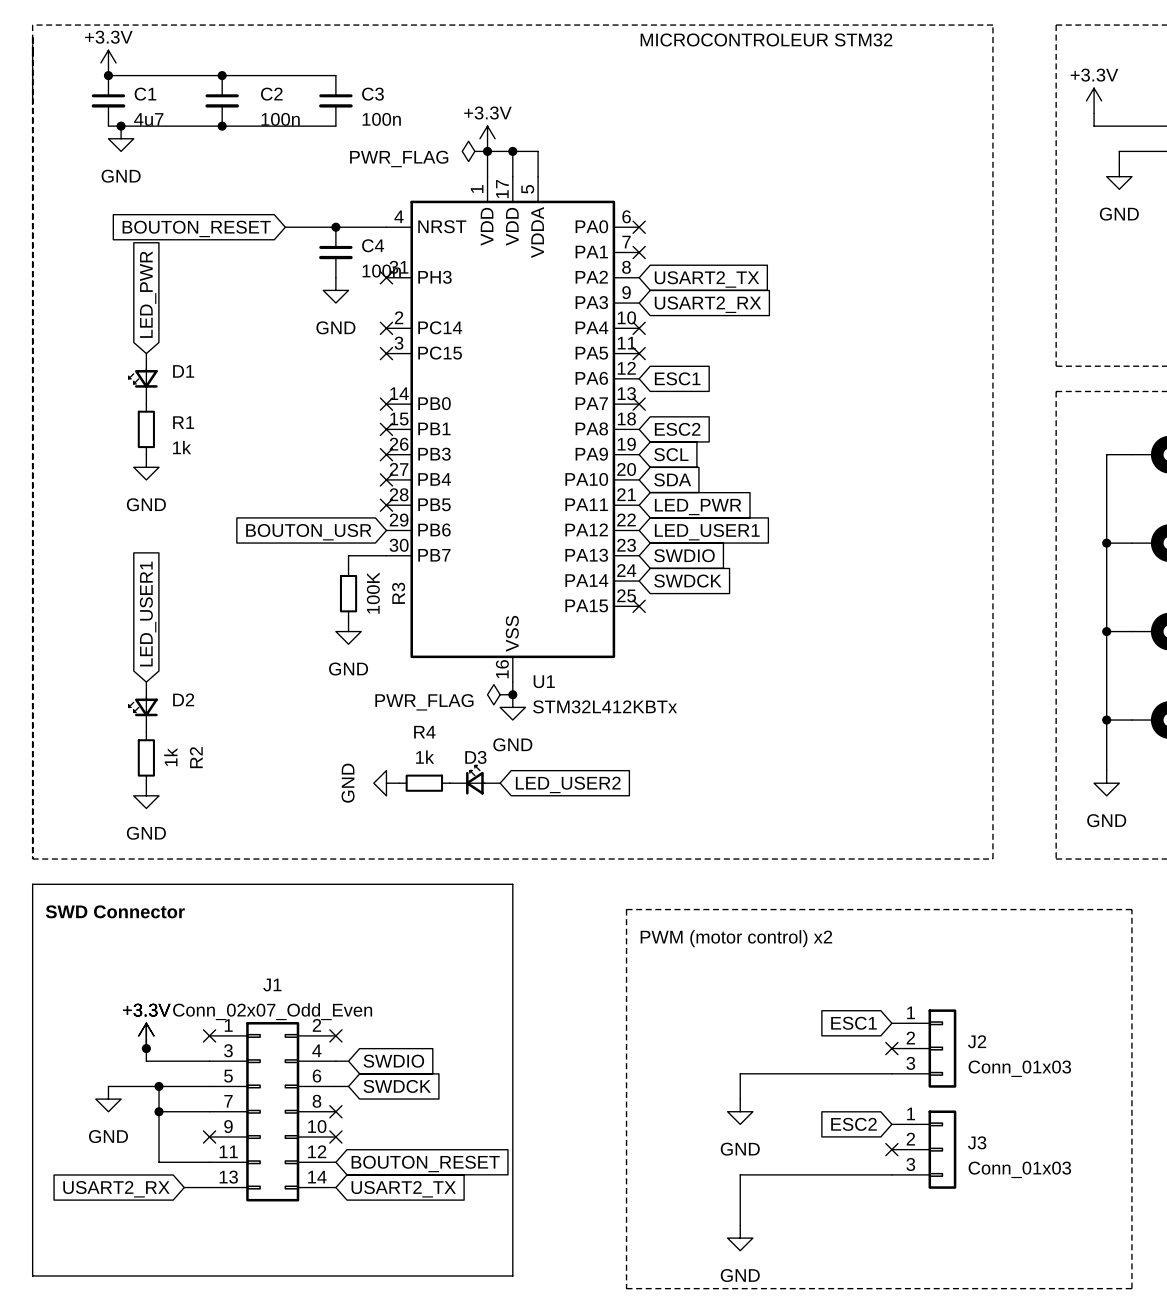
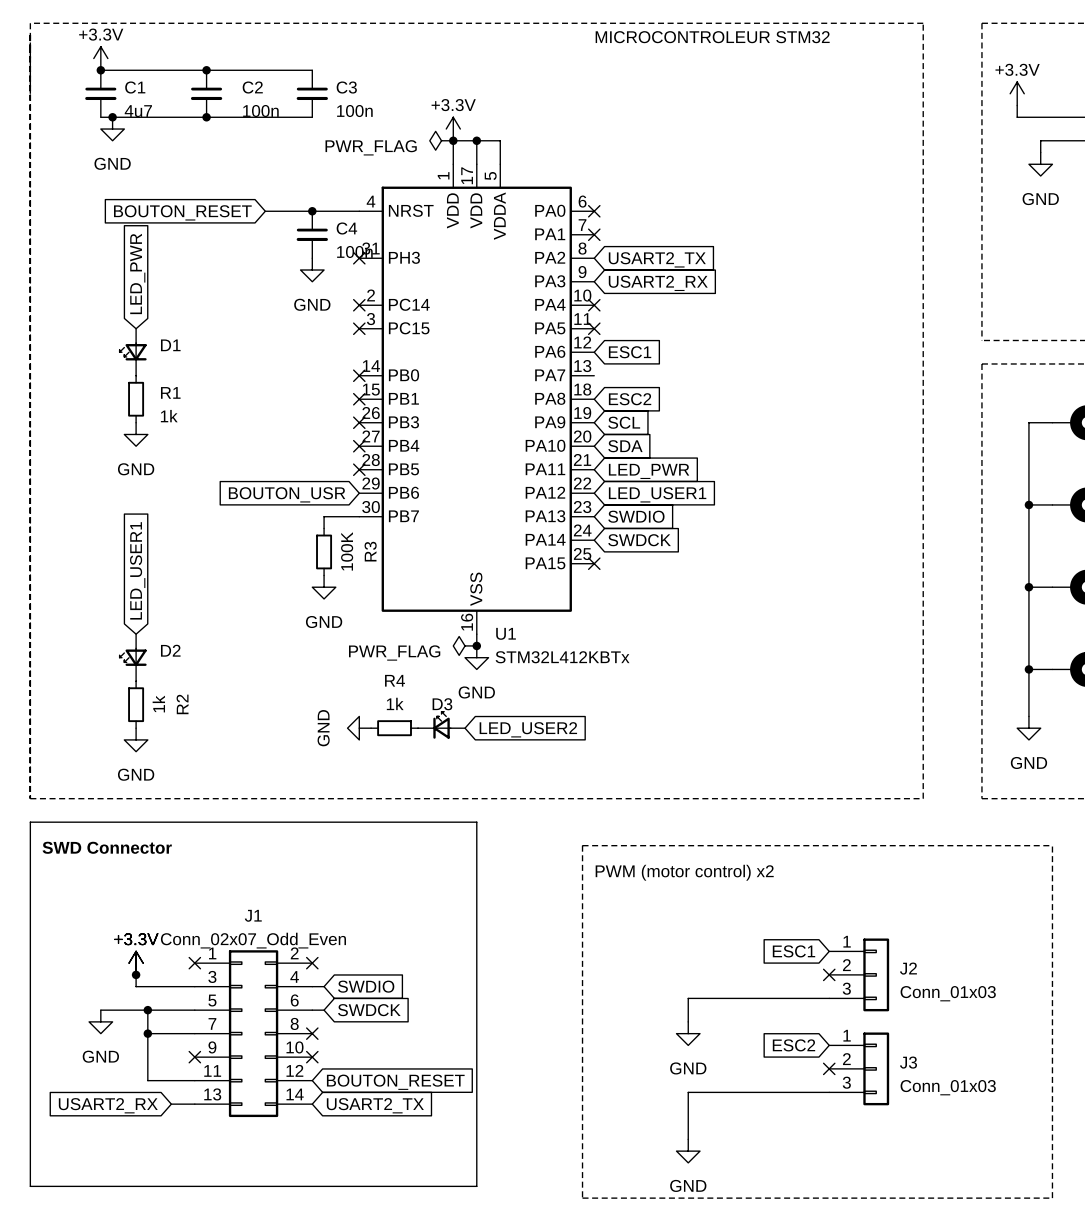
no-connect mark: (639, 404) -> none

